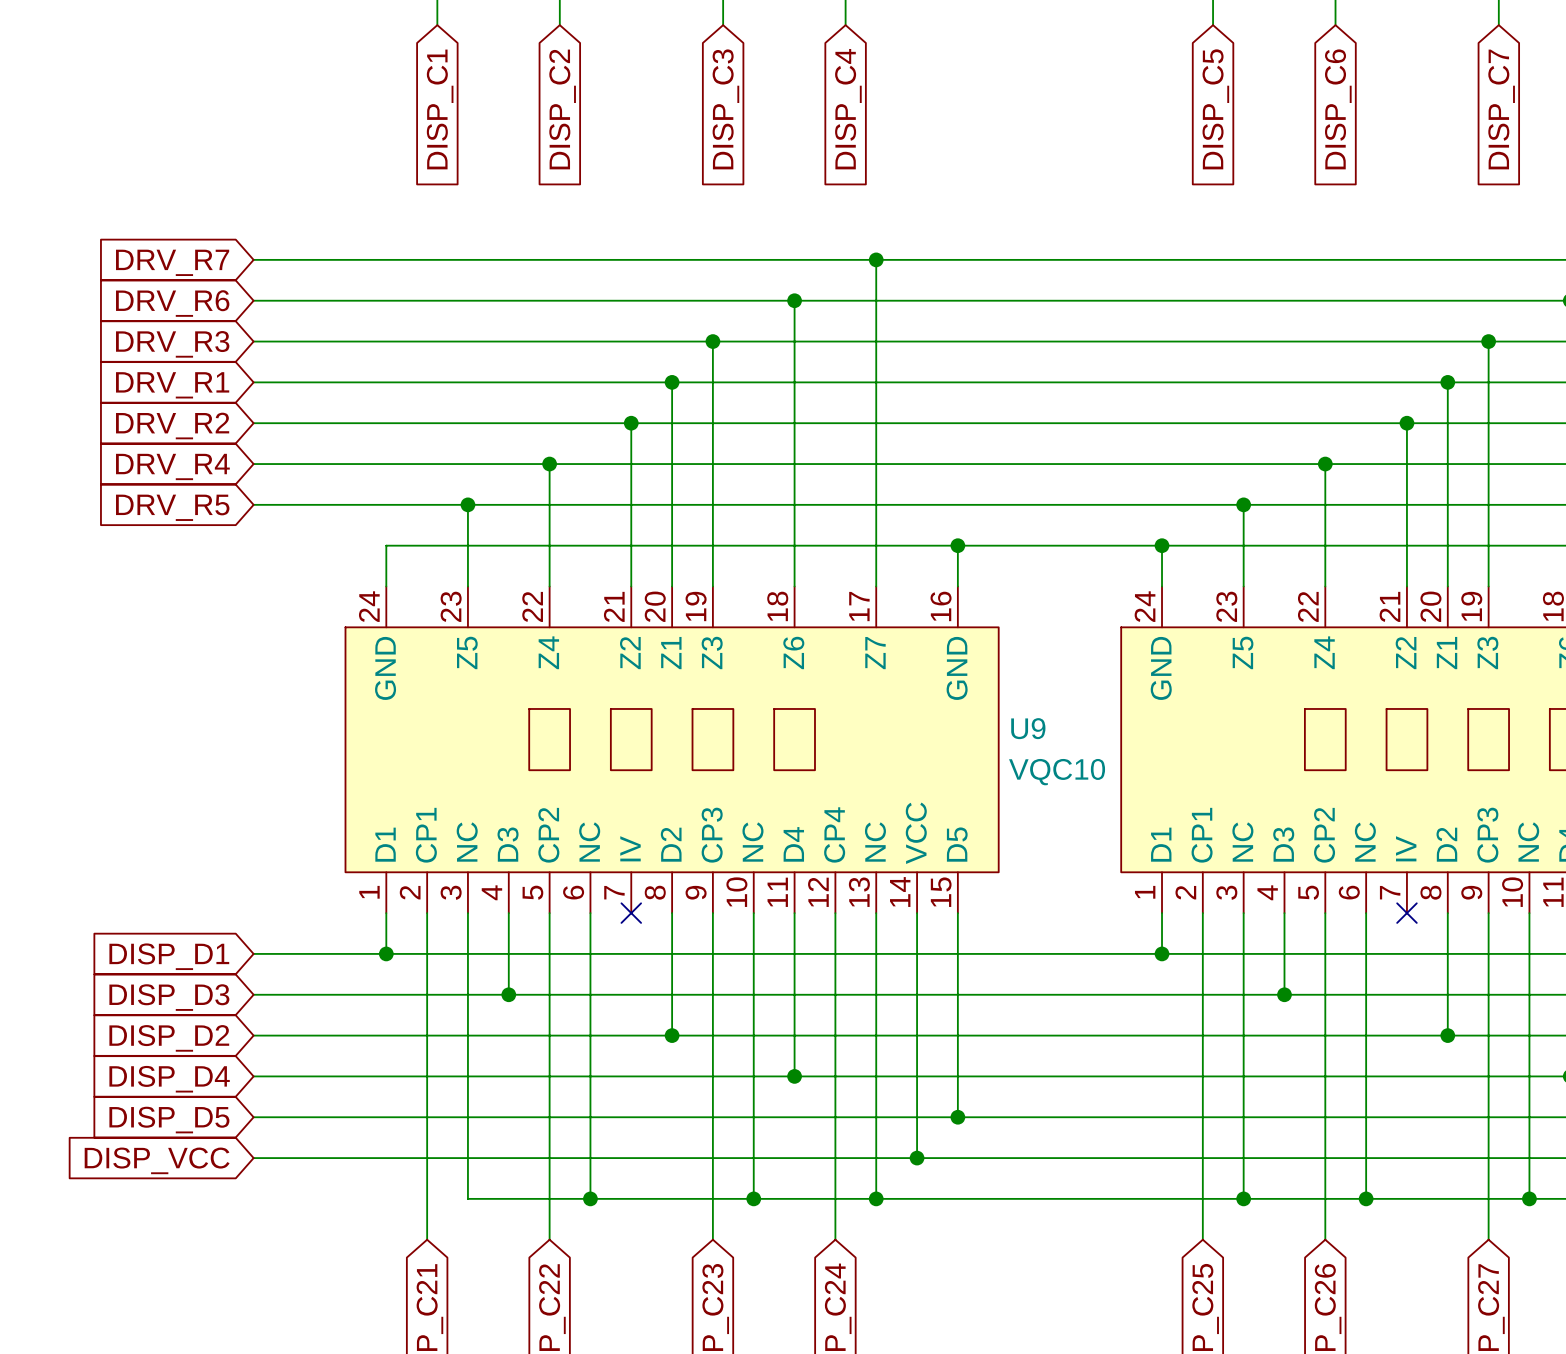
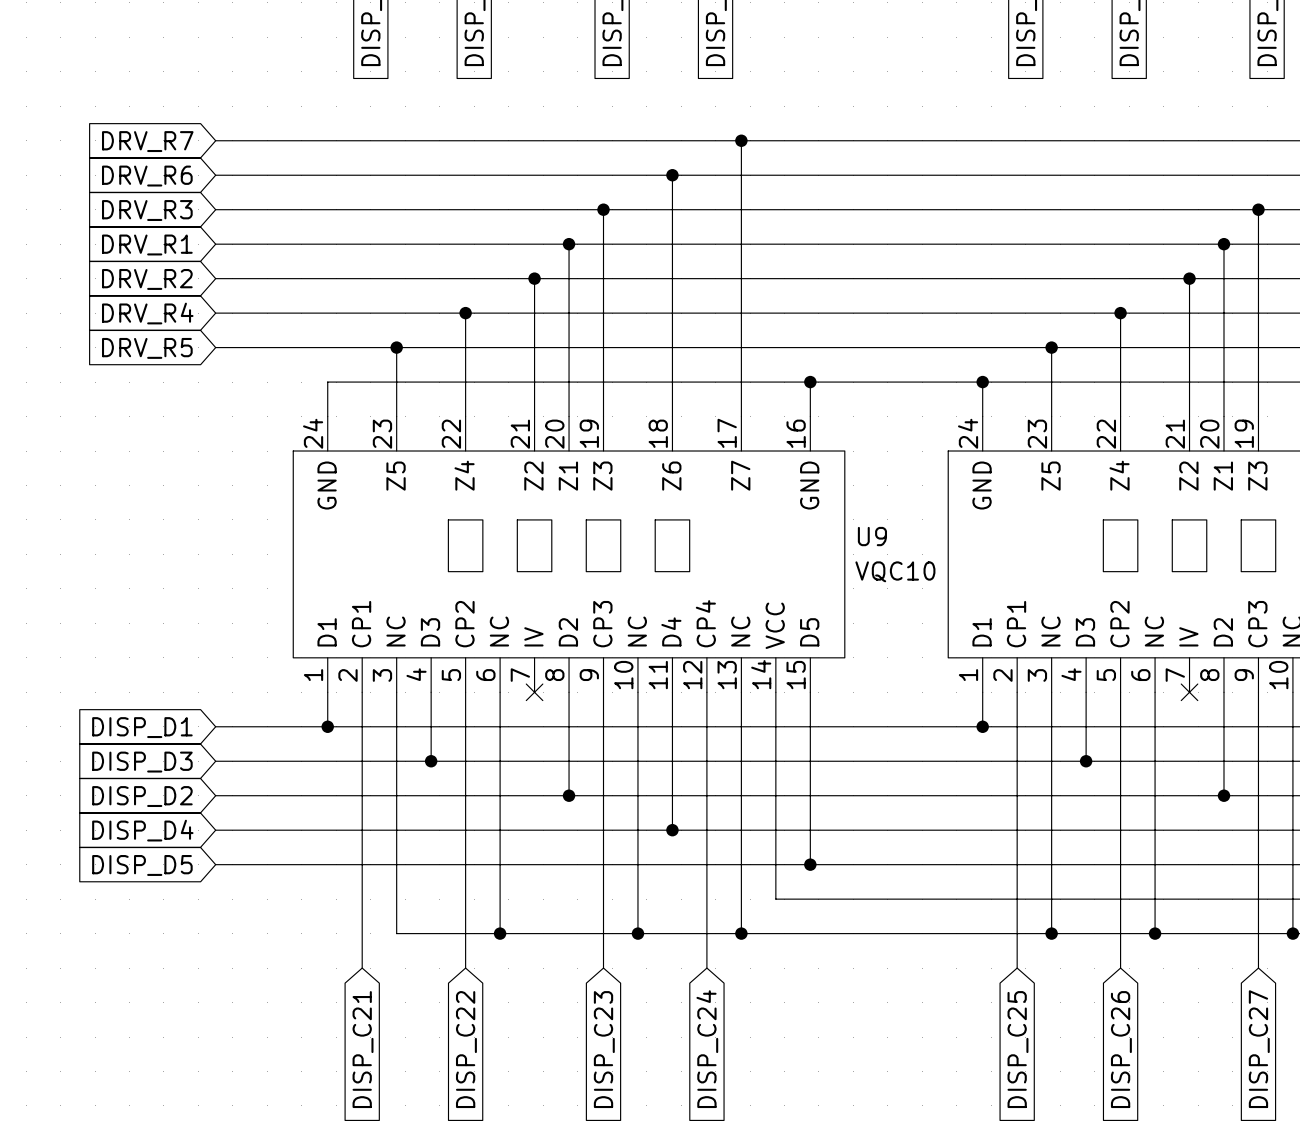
wire: (253, 1158) (917, 1158) -> none
junction: (917, 1158) -> none
global label: DISP_VCC (157, 1160) -> none

